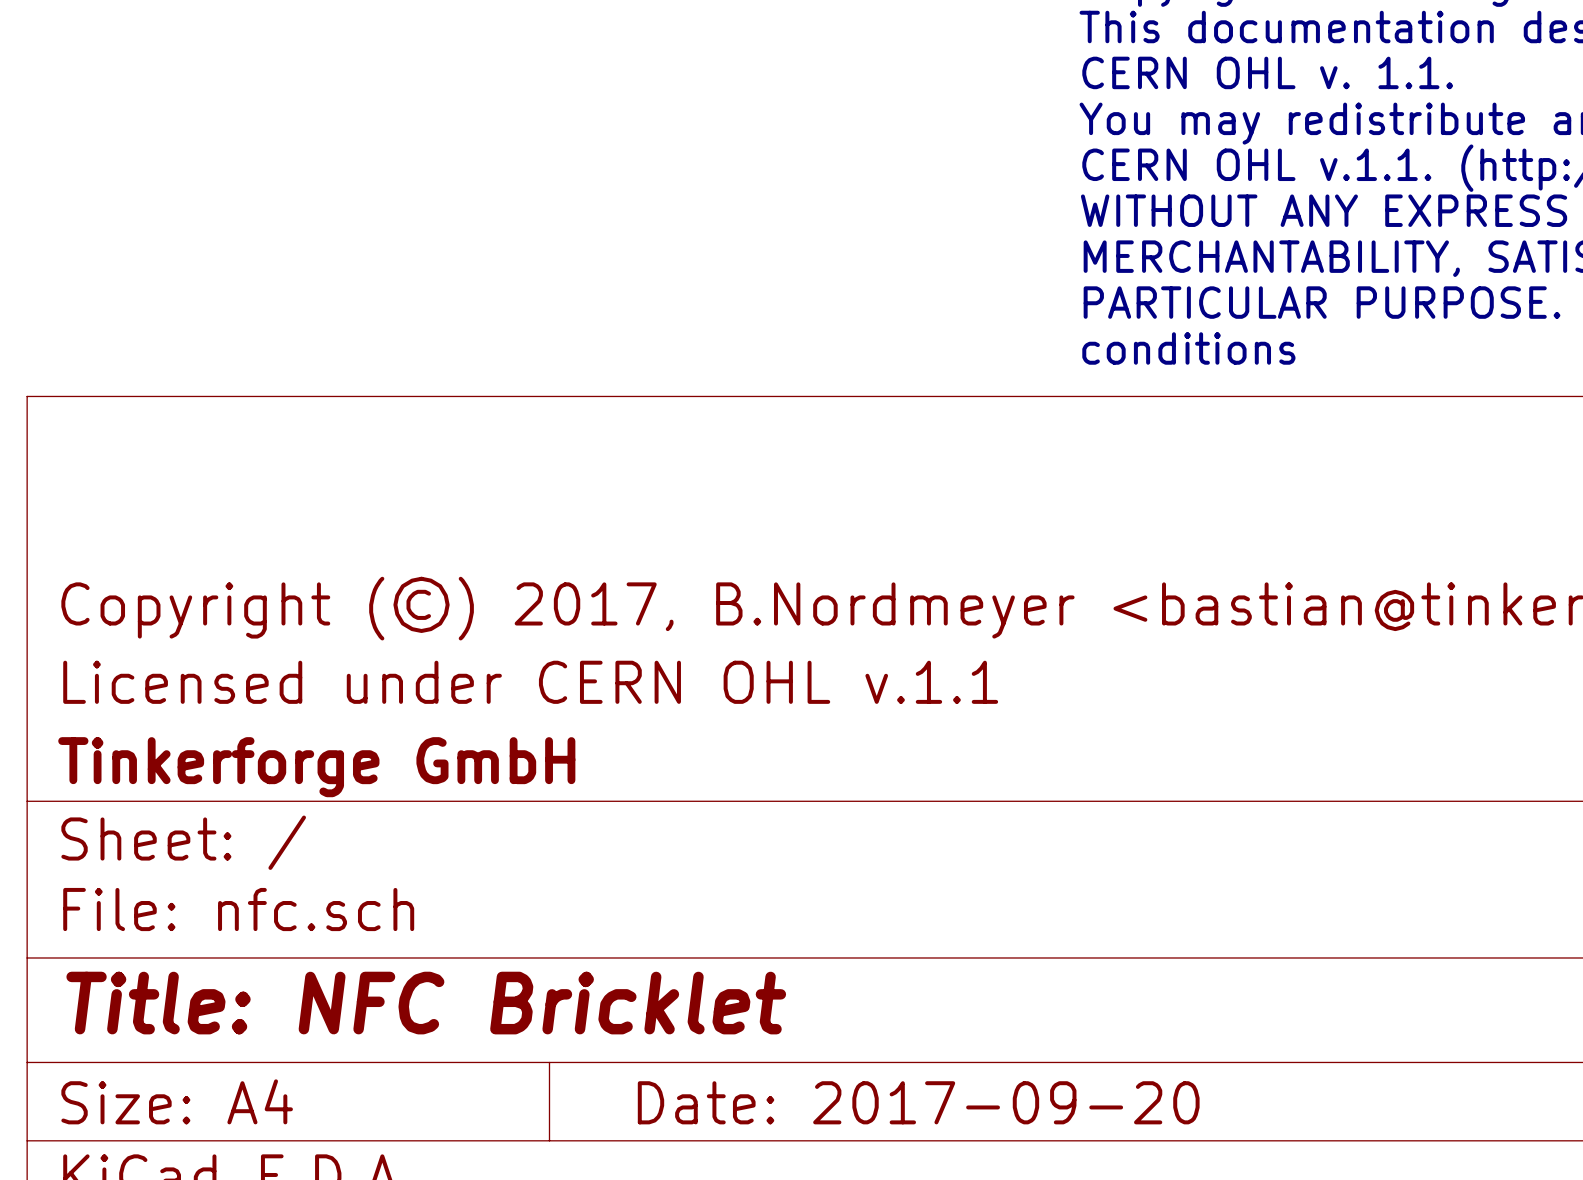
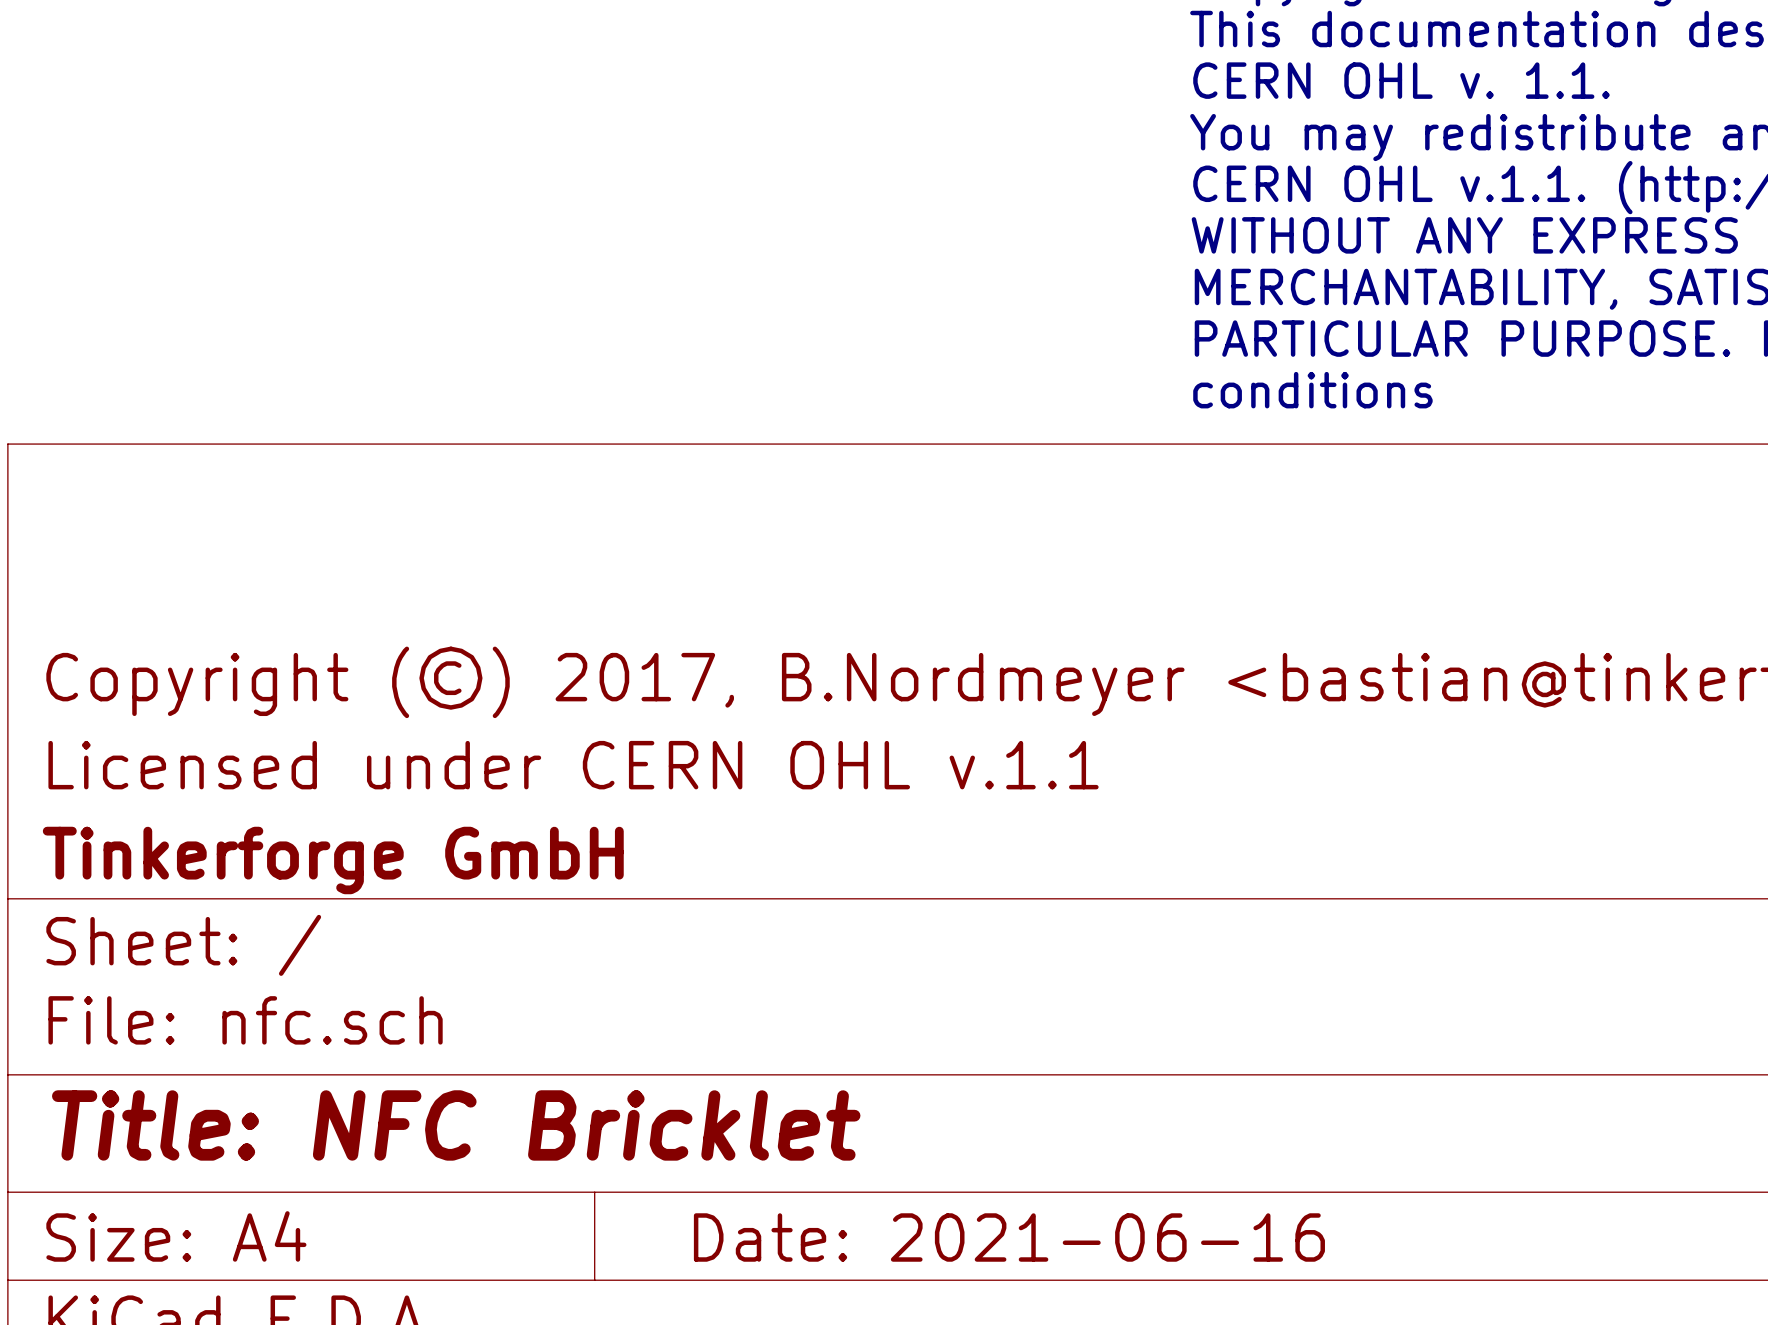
title block: Date: 2017-09-20 (918, 1102) -> Date: 2021-06-16 (1009, 1237)

